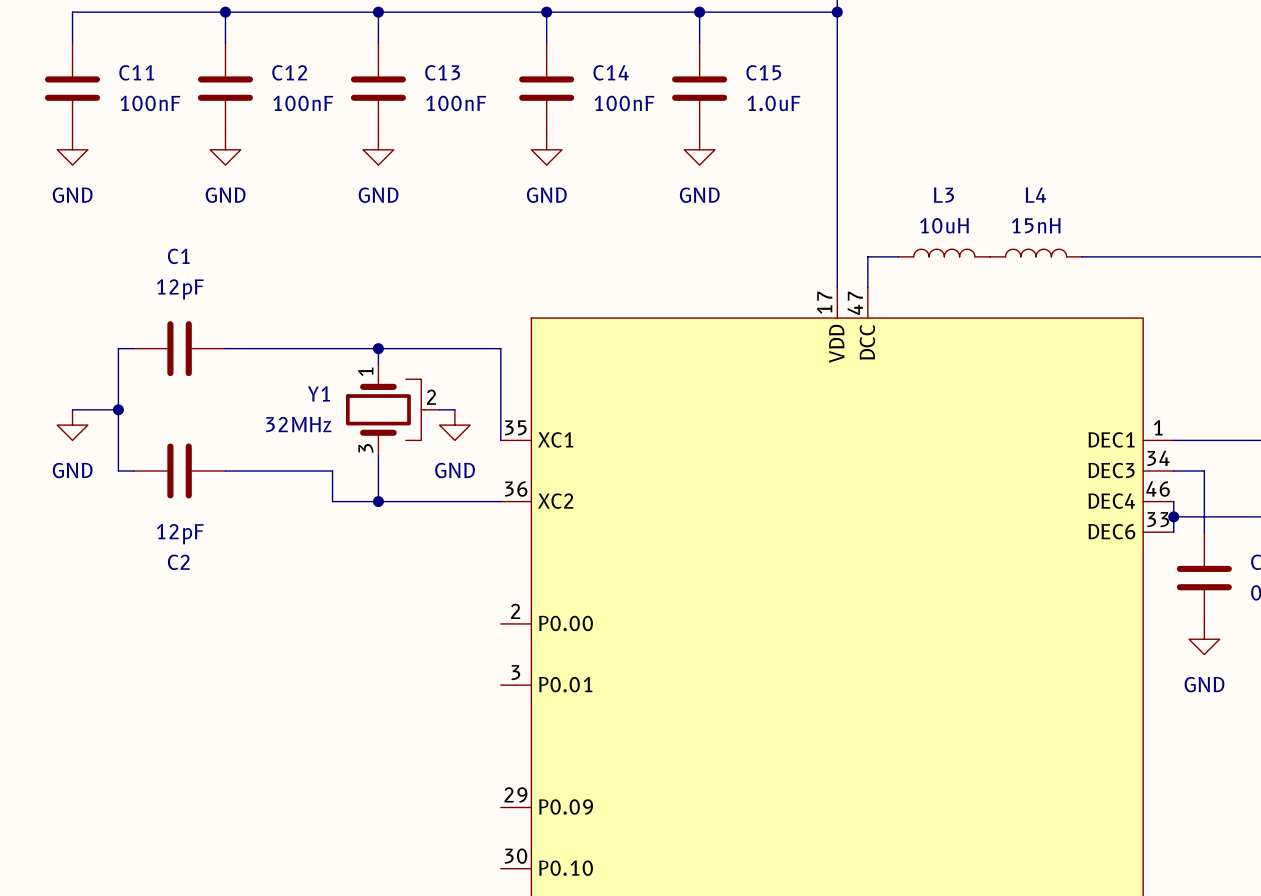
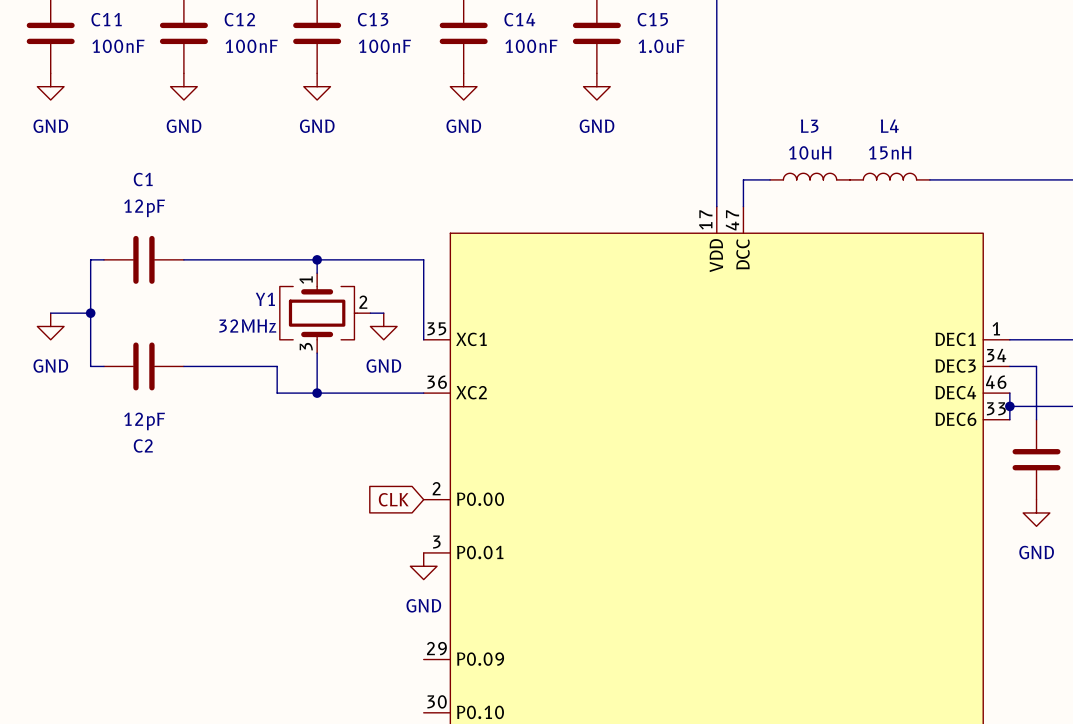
Y1 symbol: [345, 363, 440, 456] -> [279, 273, 371, 354]
global label: none -> CLK (393, 499)
power symbol: none -> GND (423, 566)

